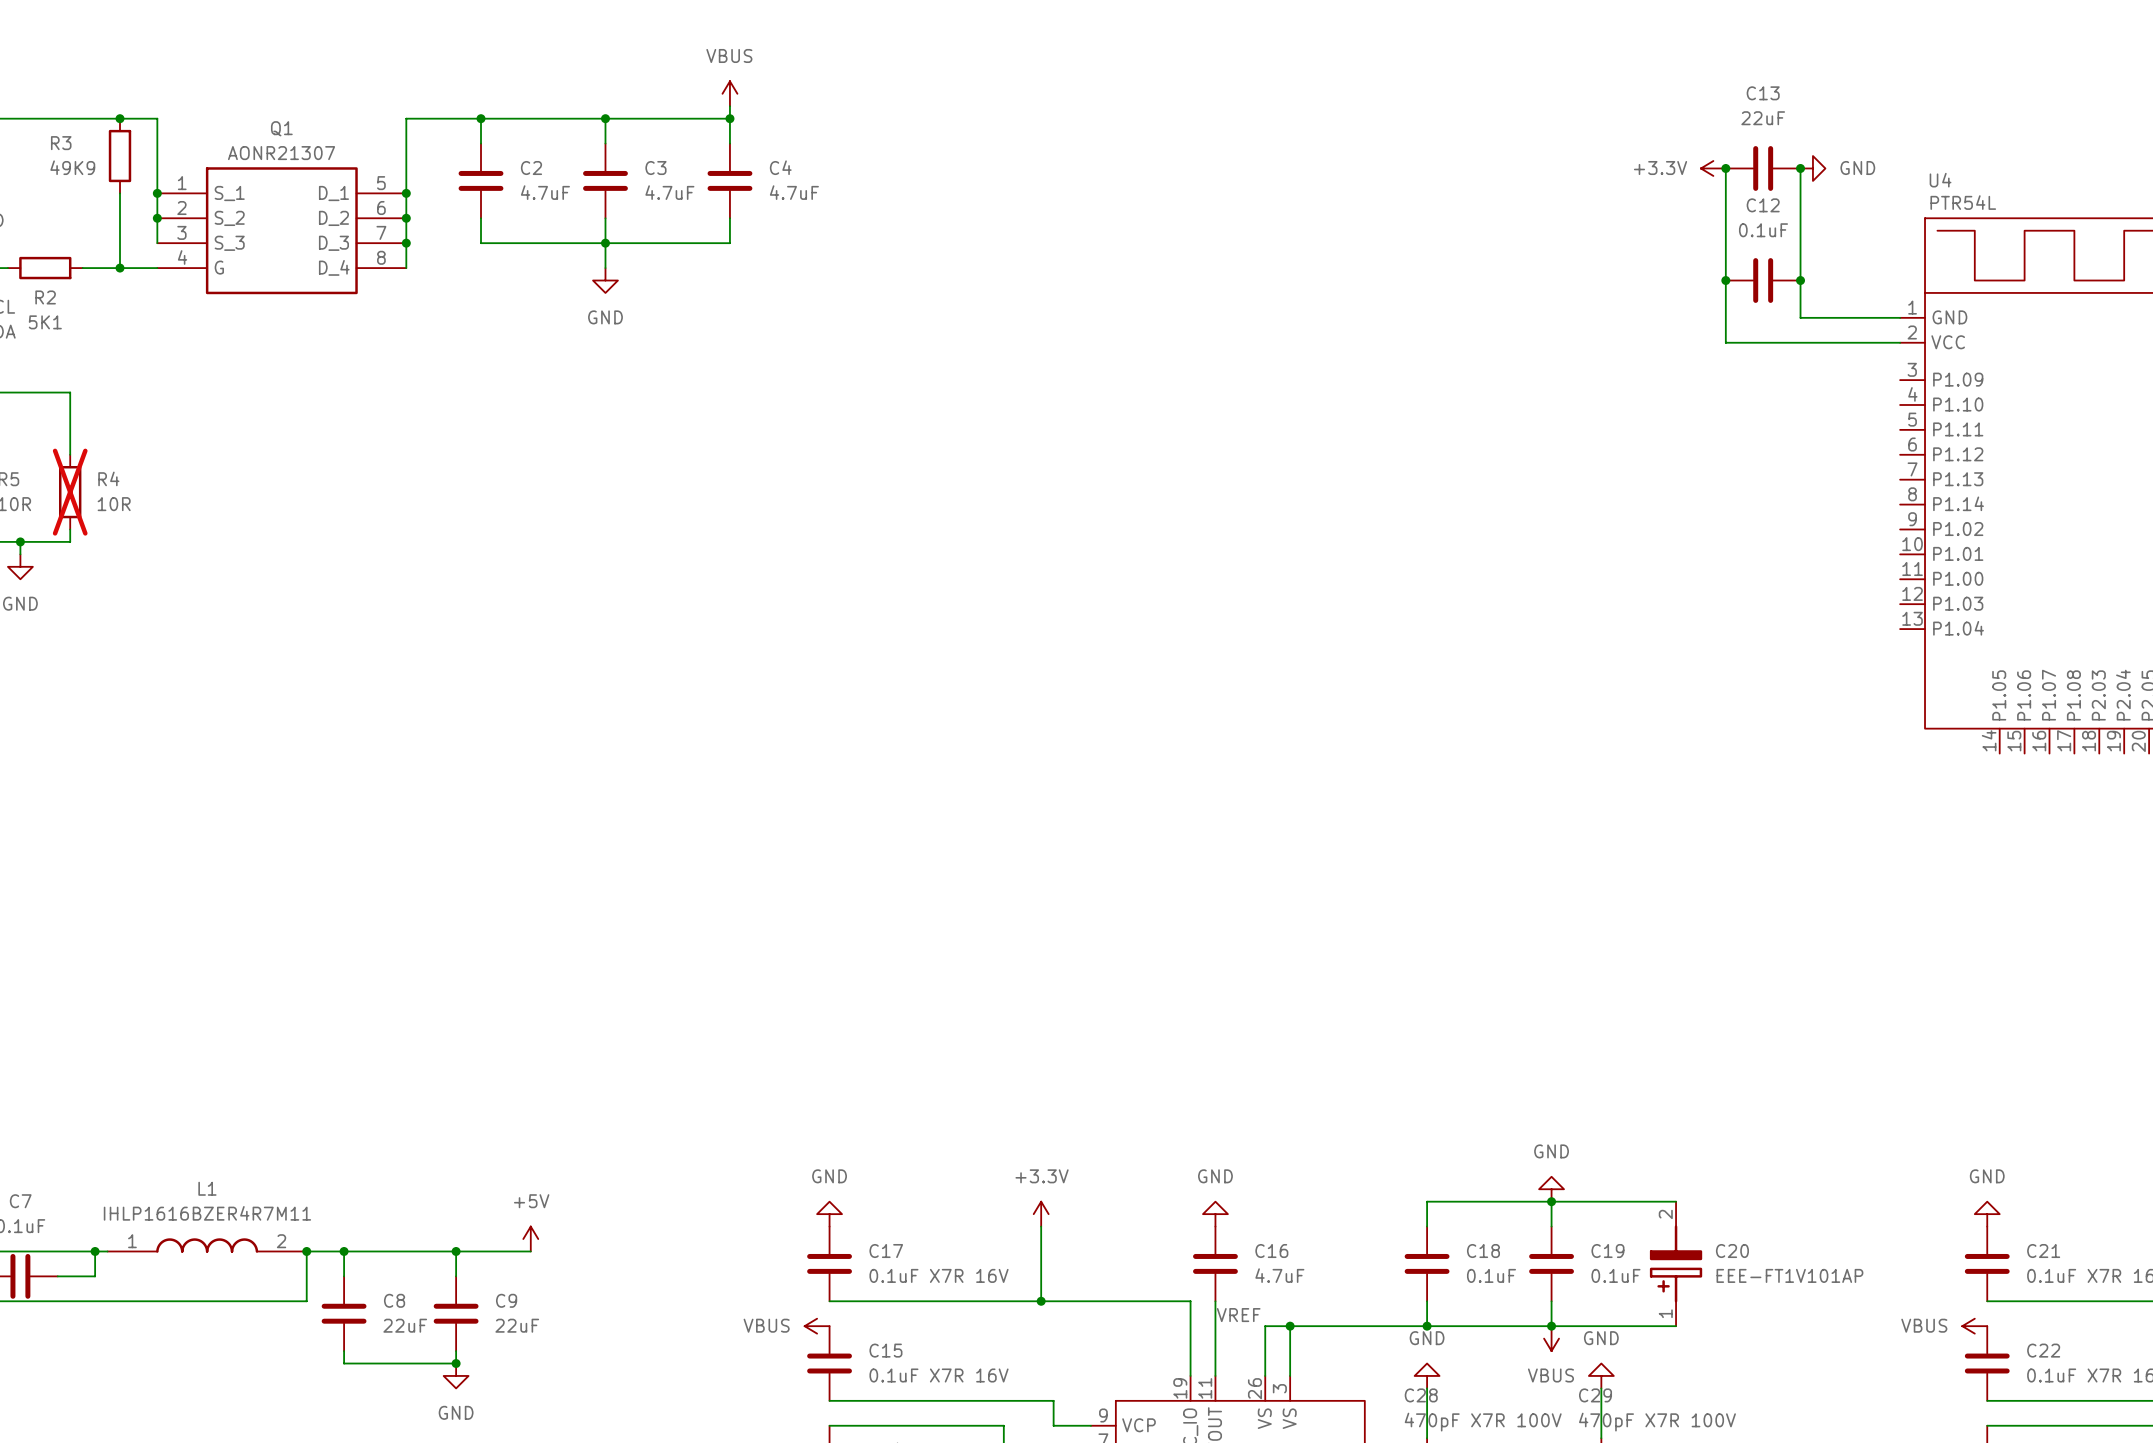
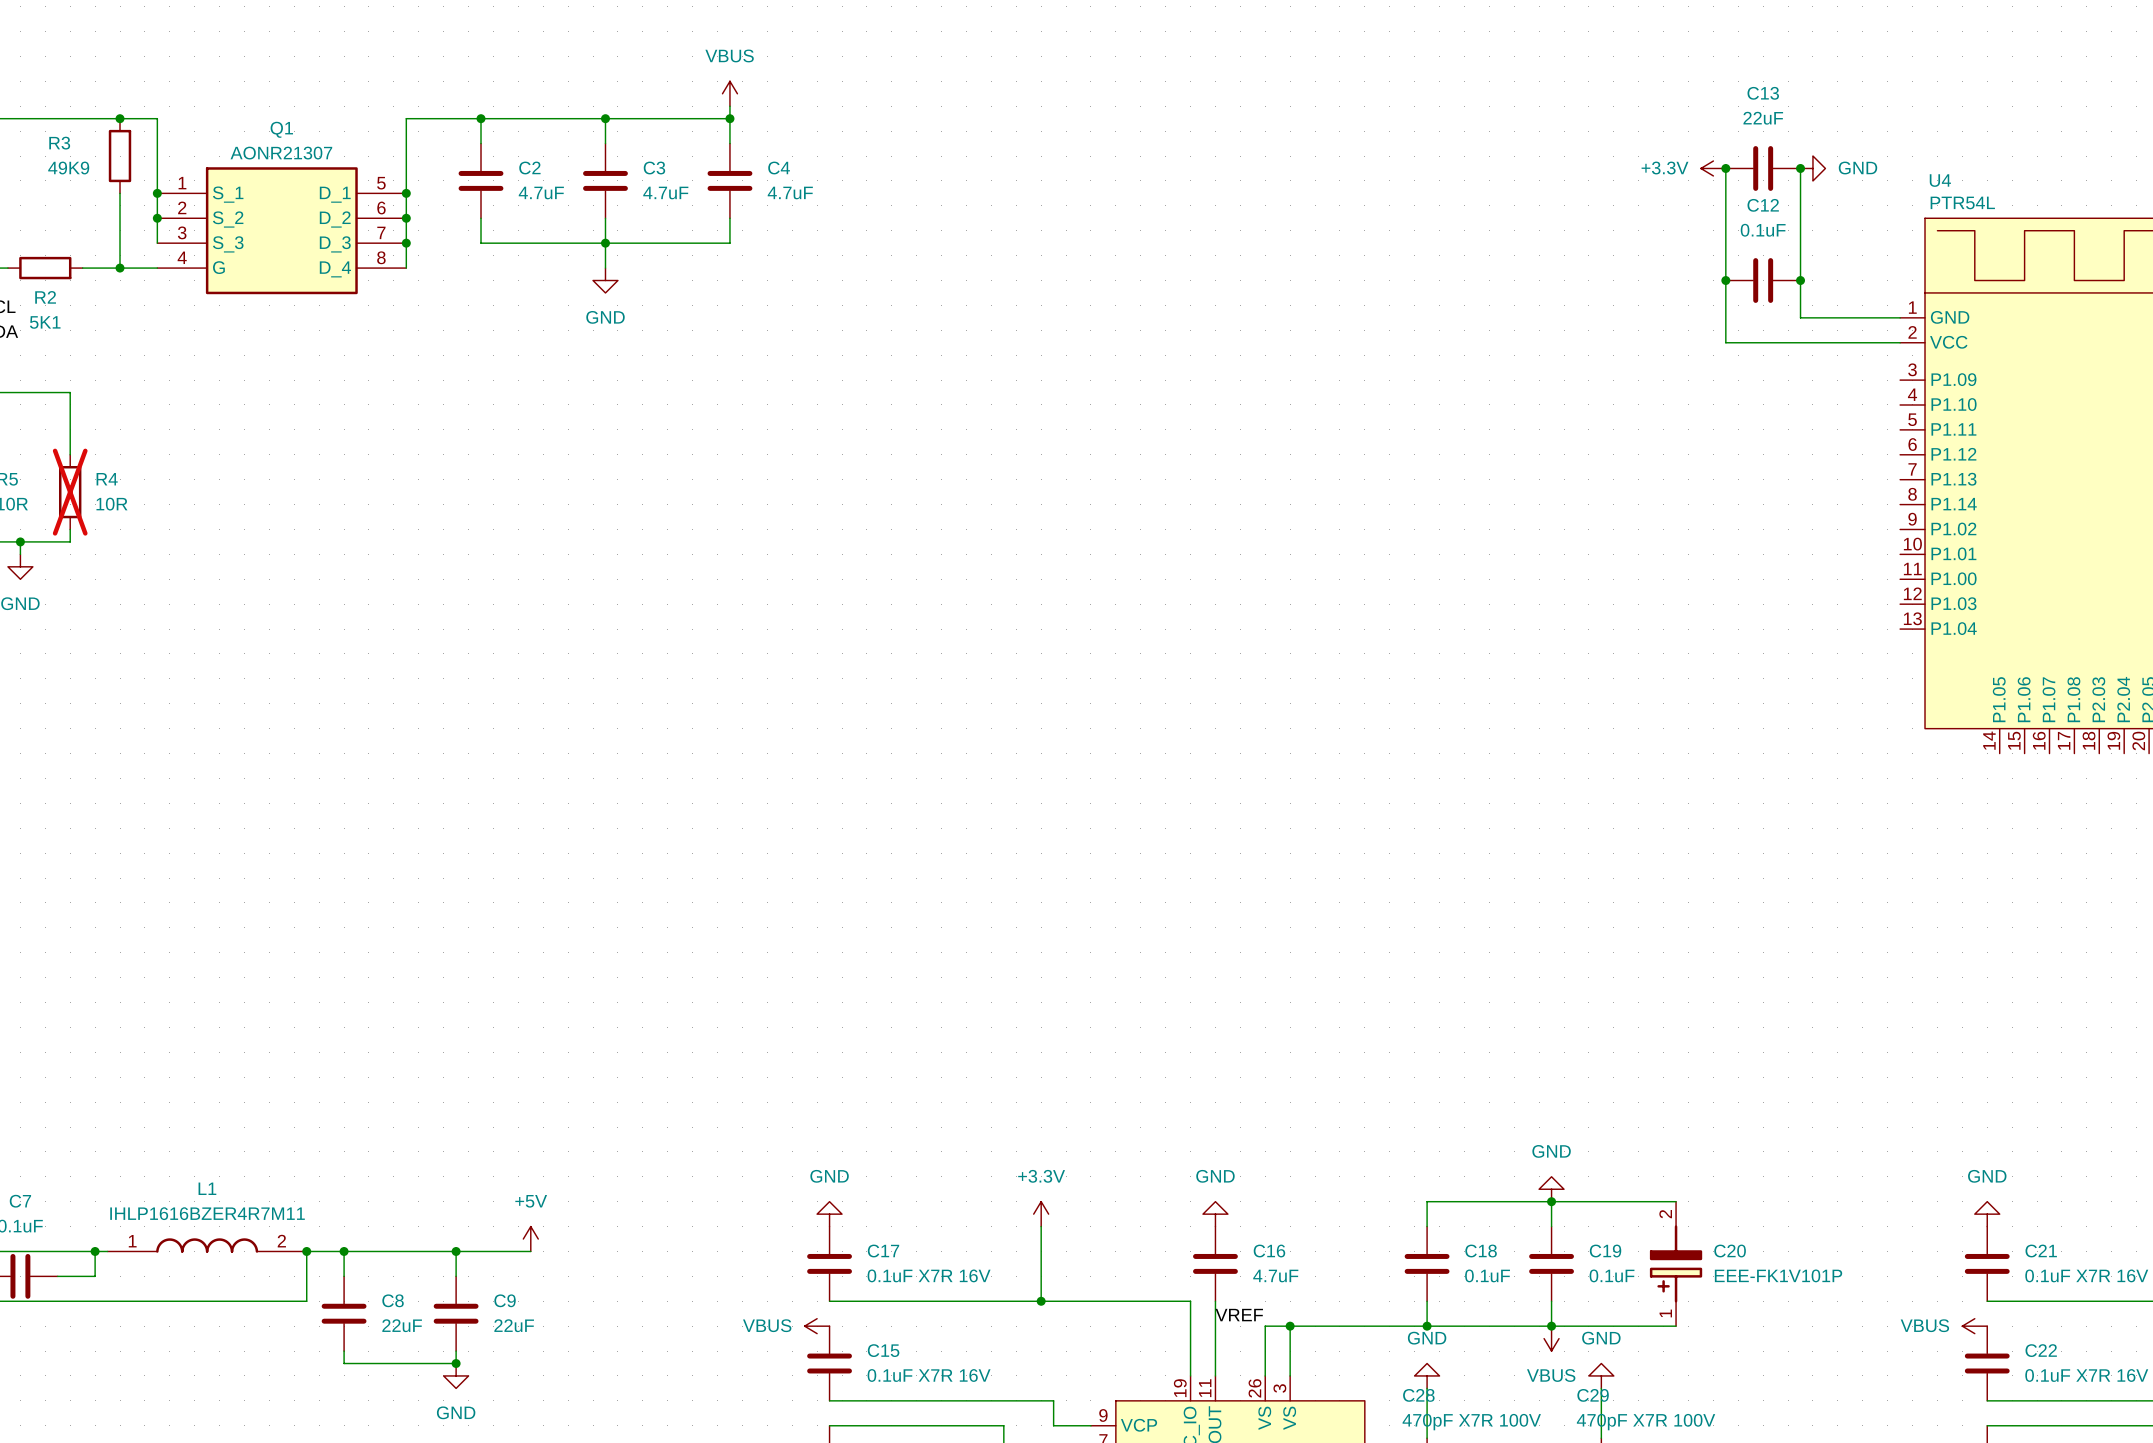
C20 value: EEE-FT1V101AP (1789, 1275) -> EEE-FK1V101P (1778, 1275)

